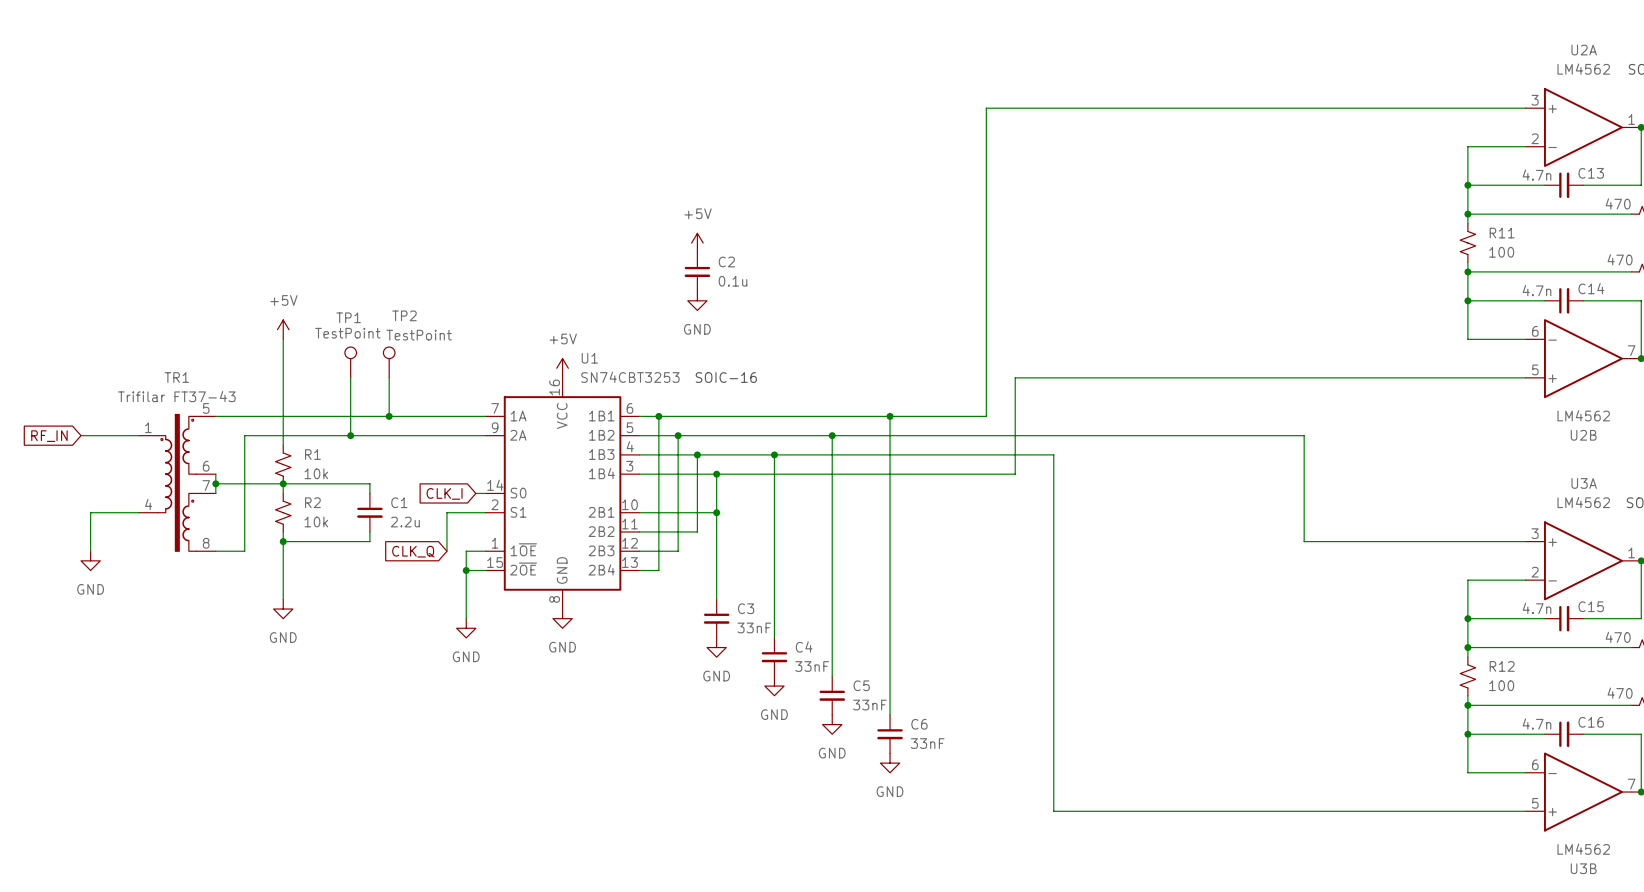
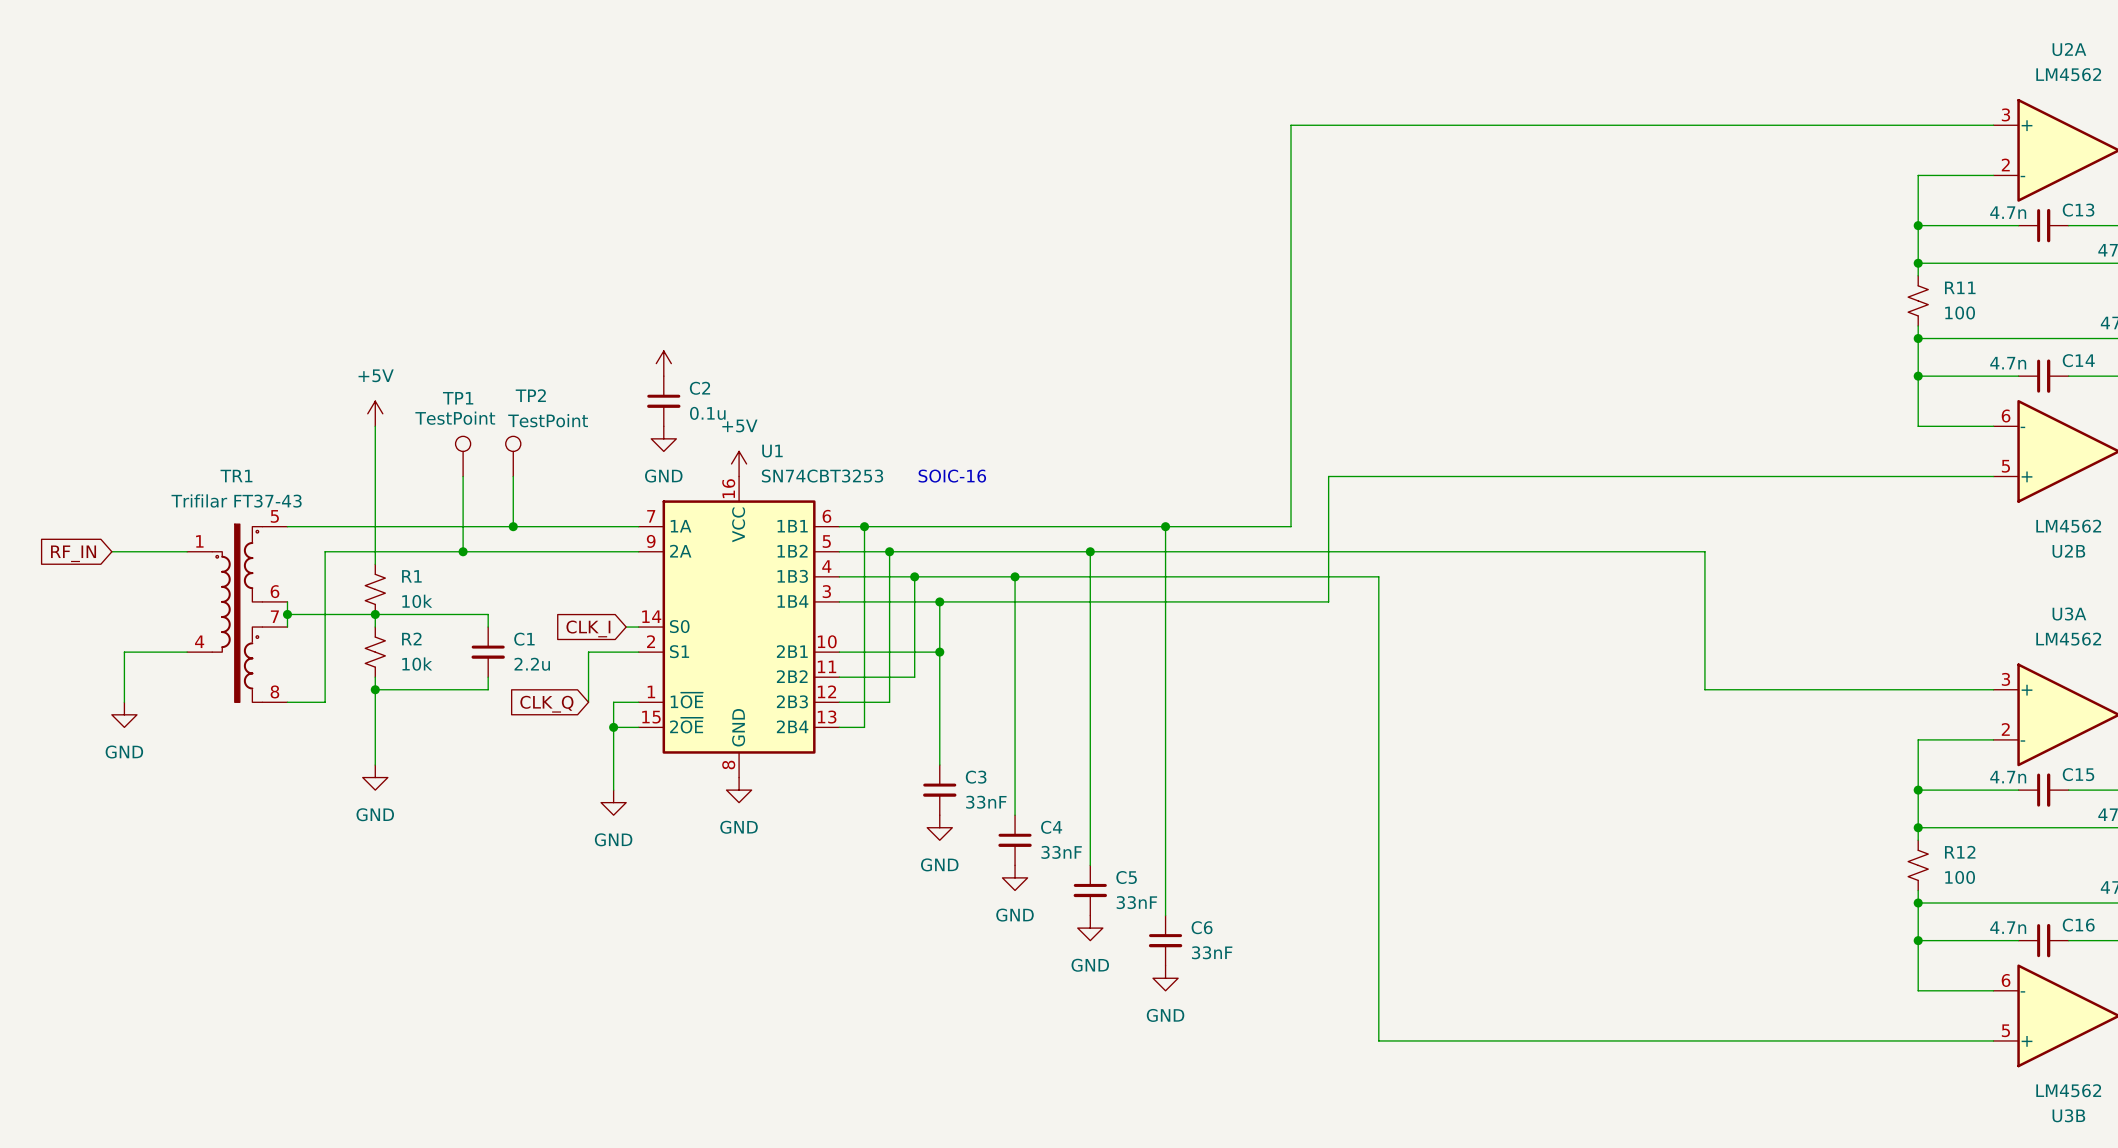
power symbol: +5V (697, 243) -> none
C2 position: (697, 271) -> (663, 401)
power symbol: none -> (663, 363)
power symbol: GND (697, 300) -> none
power symbol: none -> GND (663, 438)

